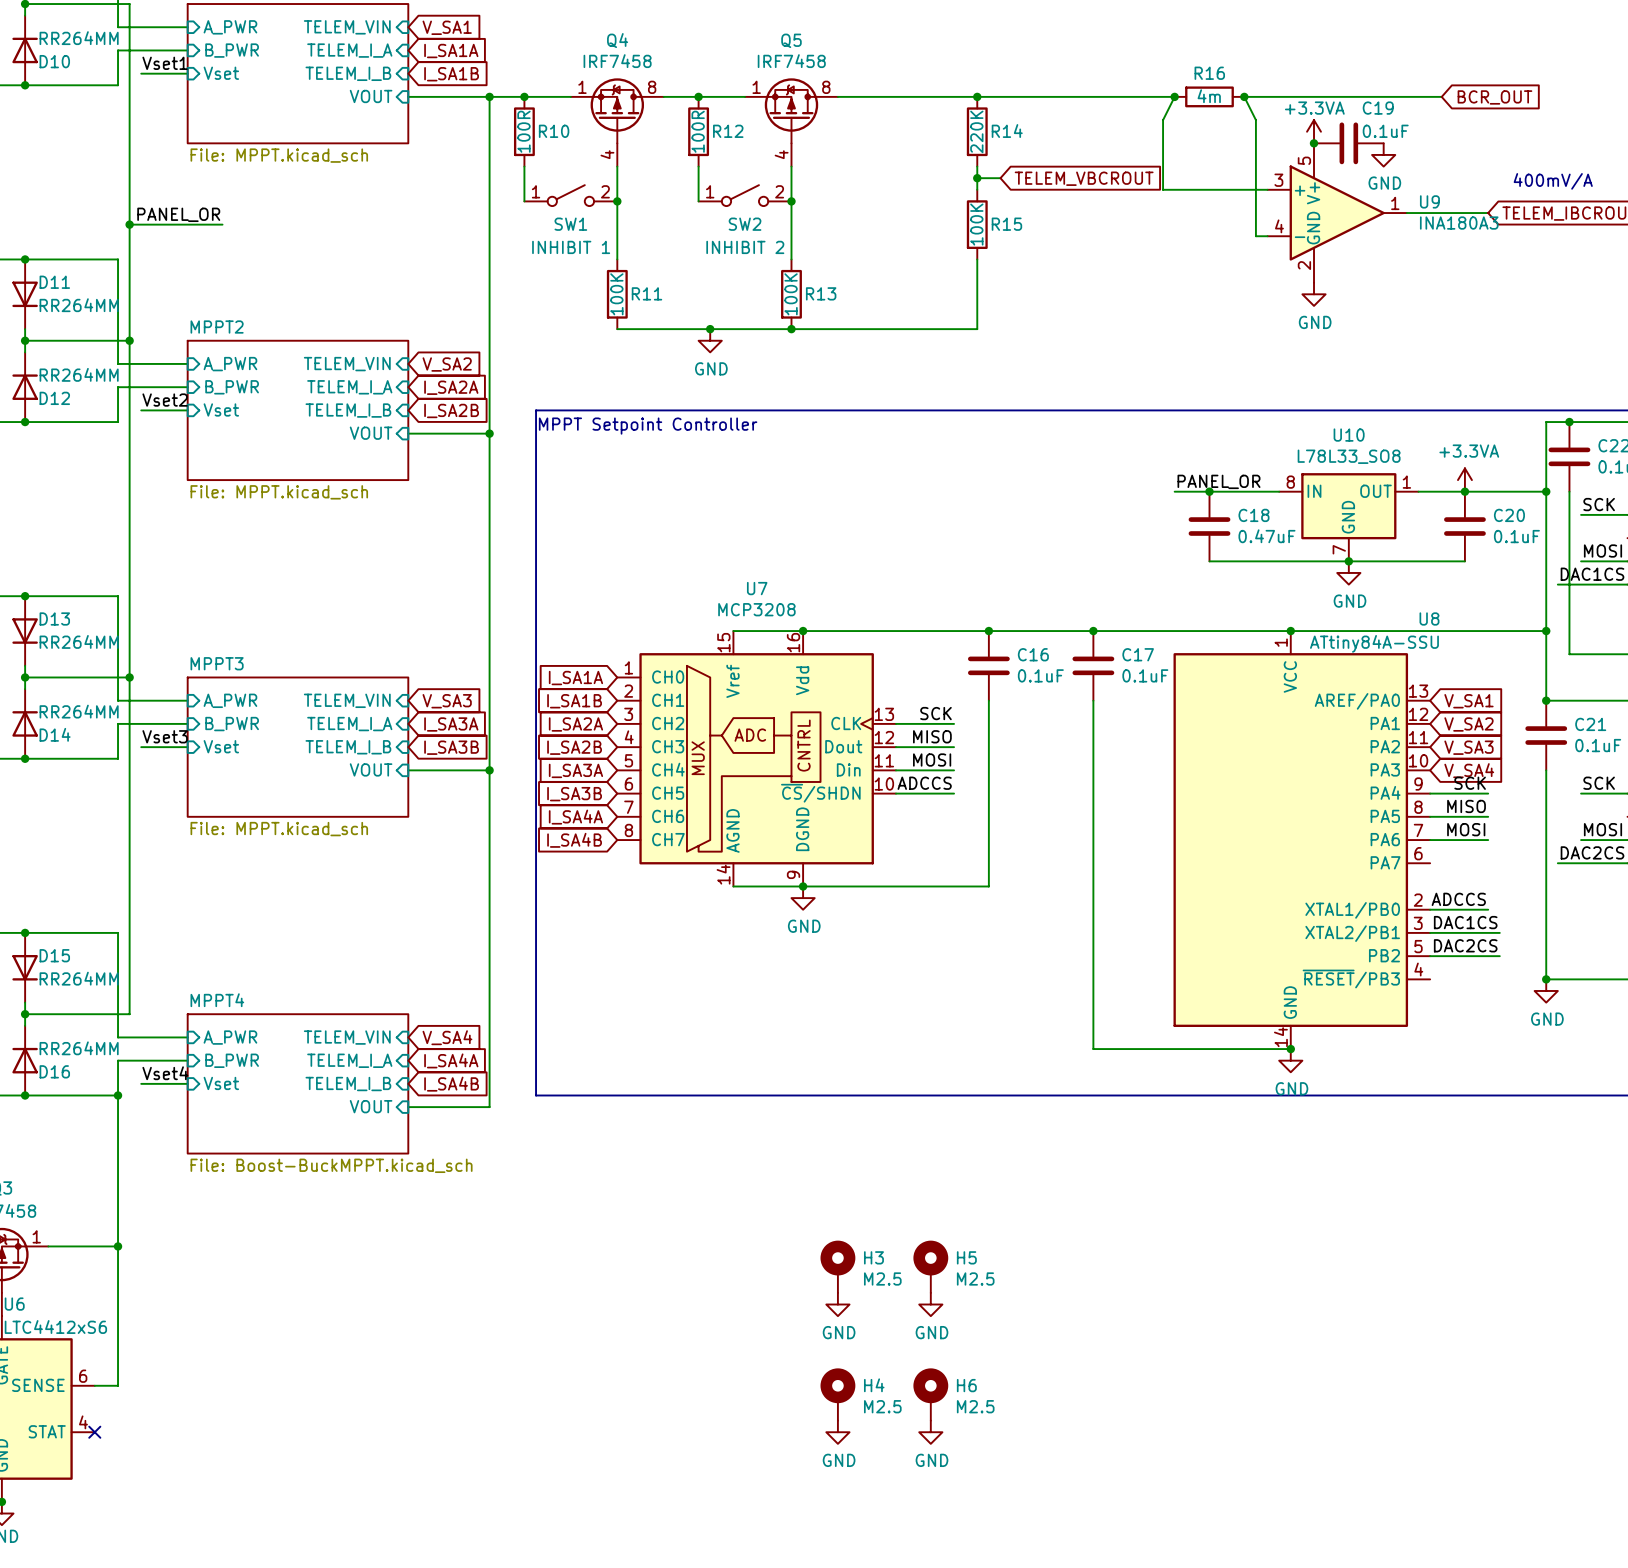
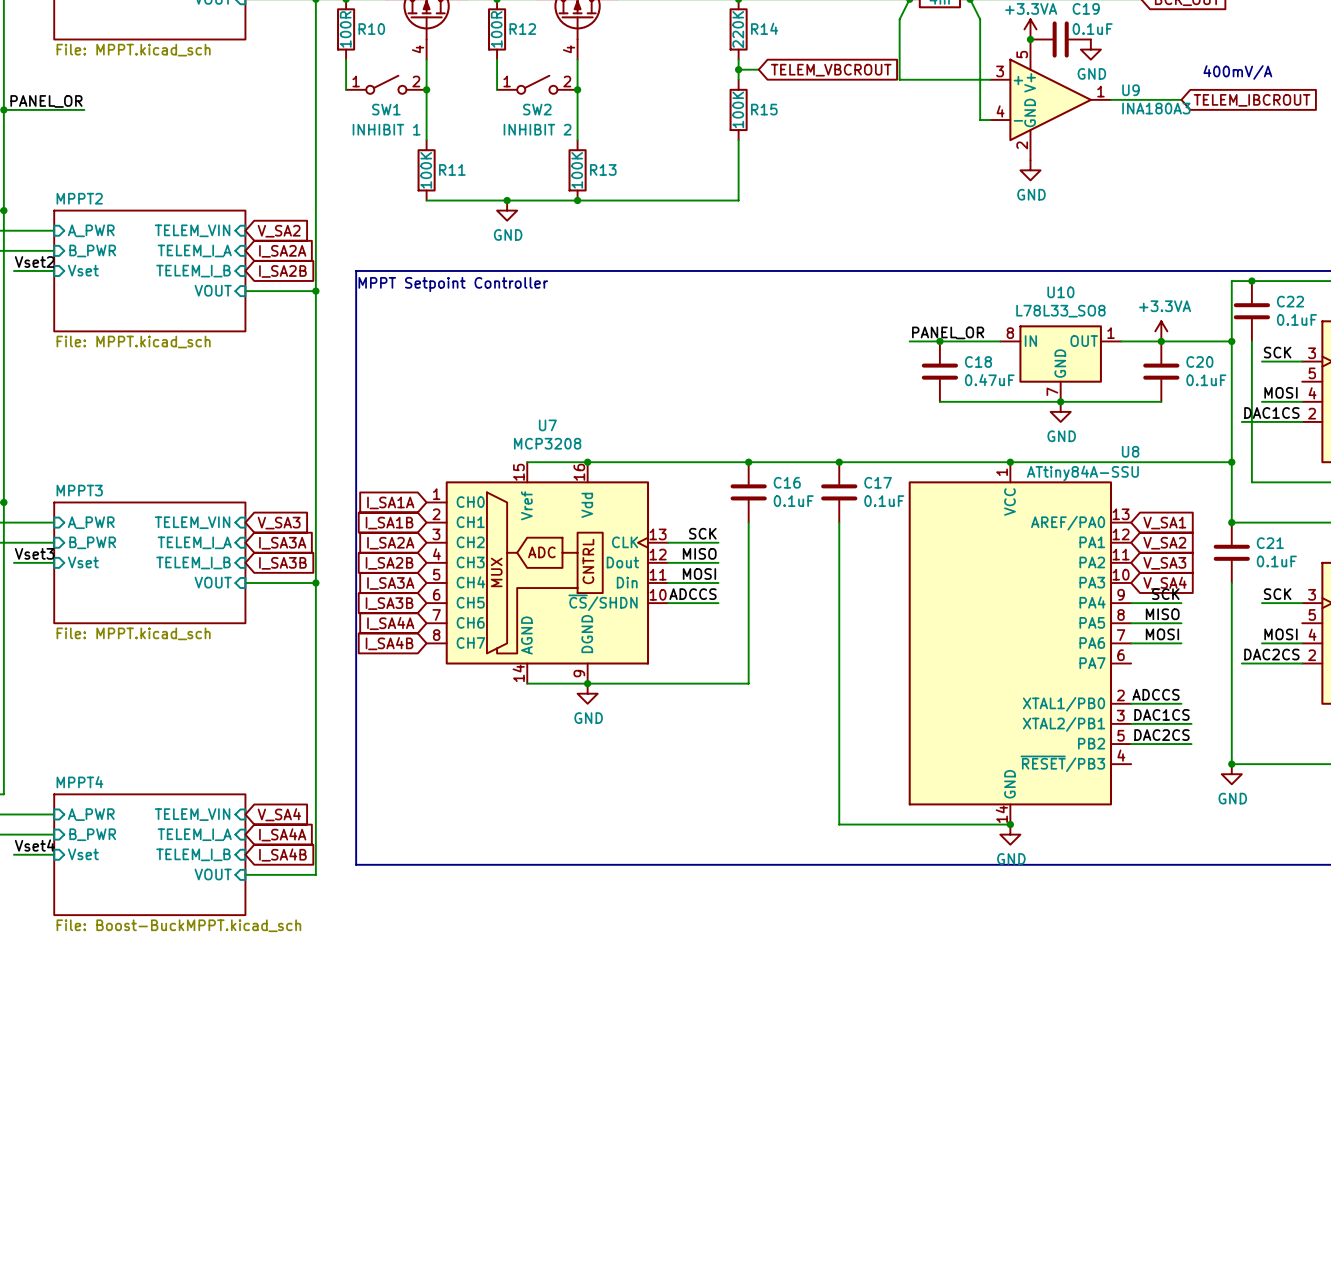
H3: M2.5 (837, 1266) -> none
H5: M2.5 (930, 1266) -> none
power symbol: GND (837, 1304) -> none
power symbol: GND (930, 1304) -> none
H4: M2.5 (837, 1394) -> none
H6: M2.5 (930, 1394) -> none
power symbol: GND (837, 1432) -> none
power symbol: GND (930, 1432) -> none

